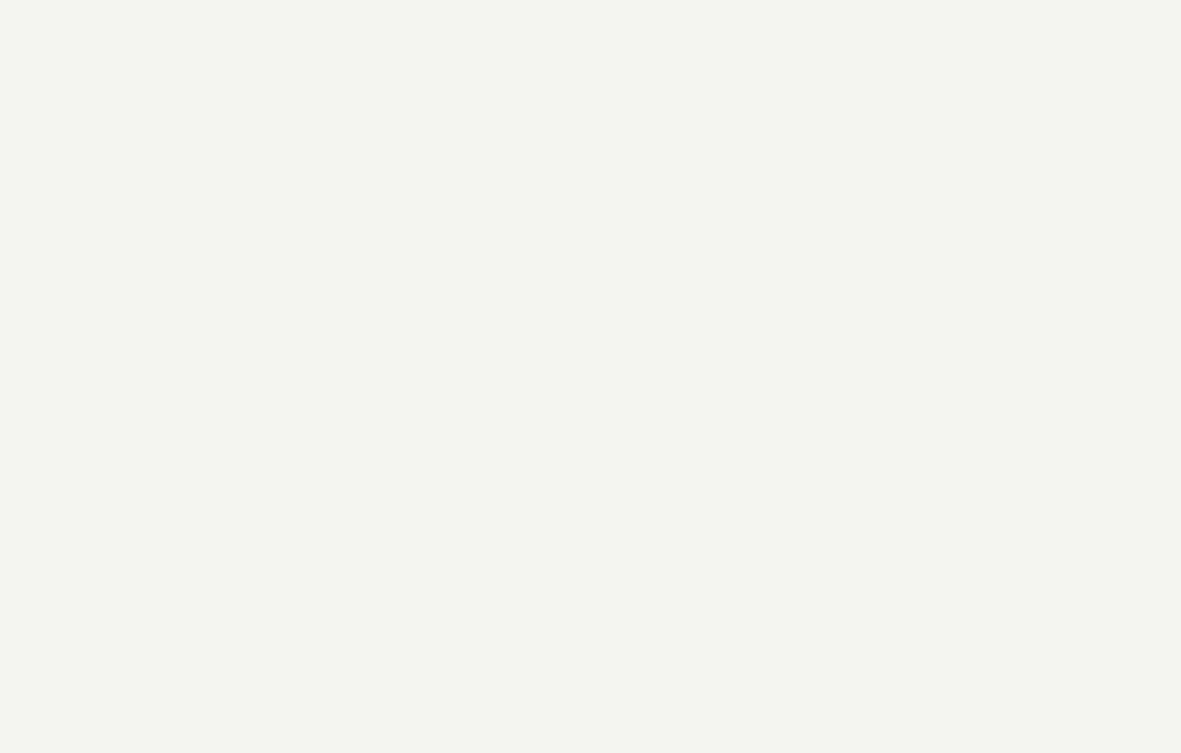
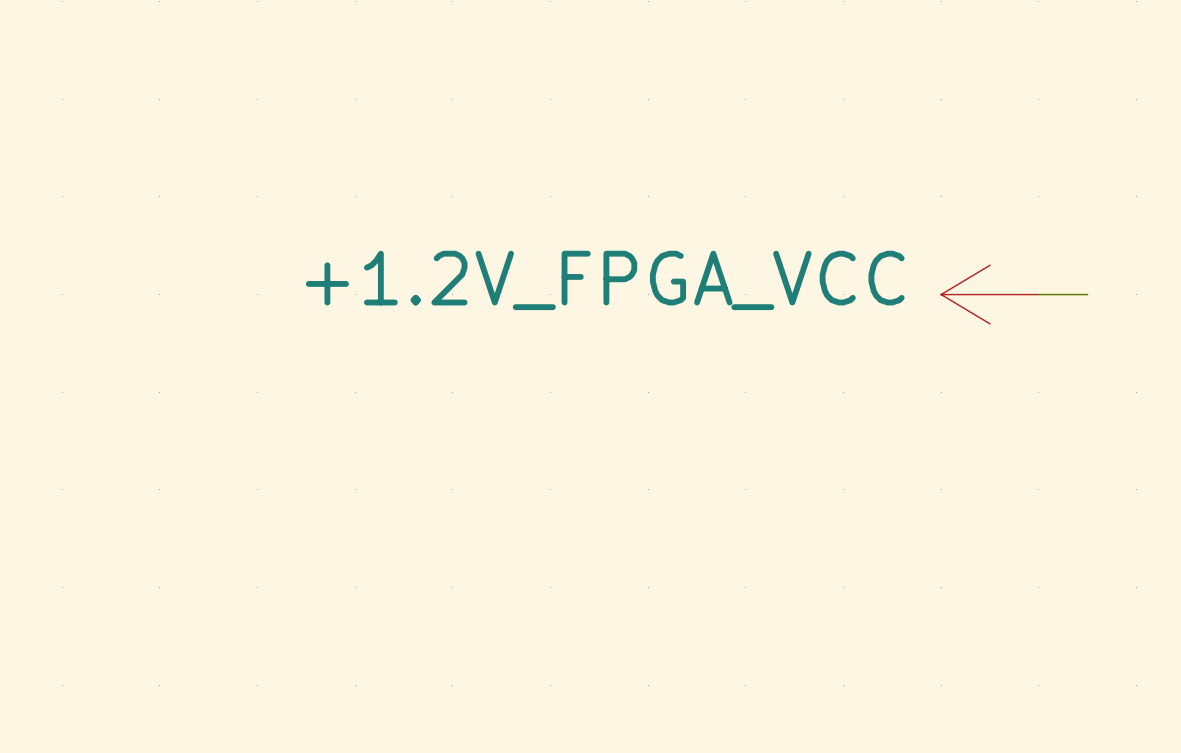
power symbol: none -> +1.2V_FPGA_VCC (989, 294)
wire: none -> (1038, 294) (1087, 294)

